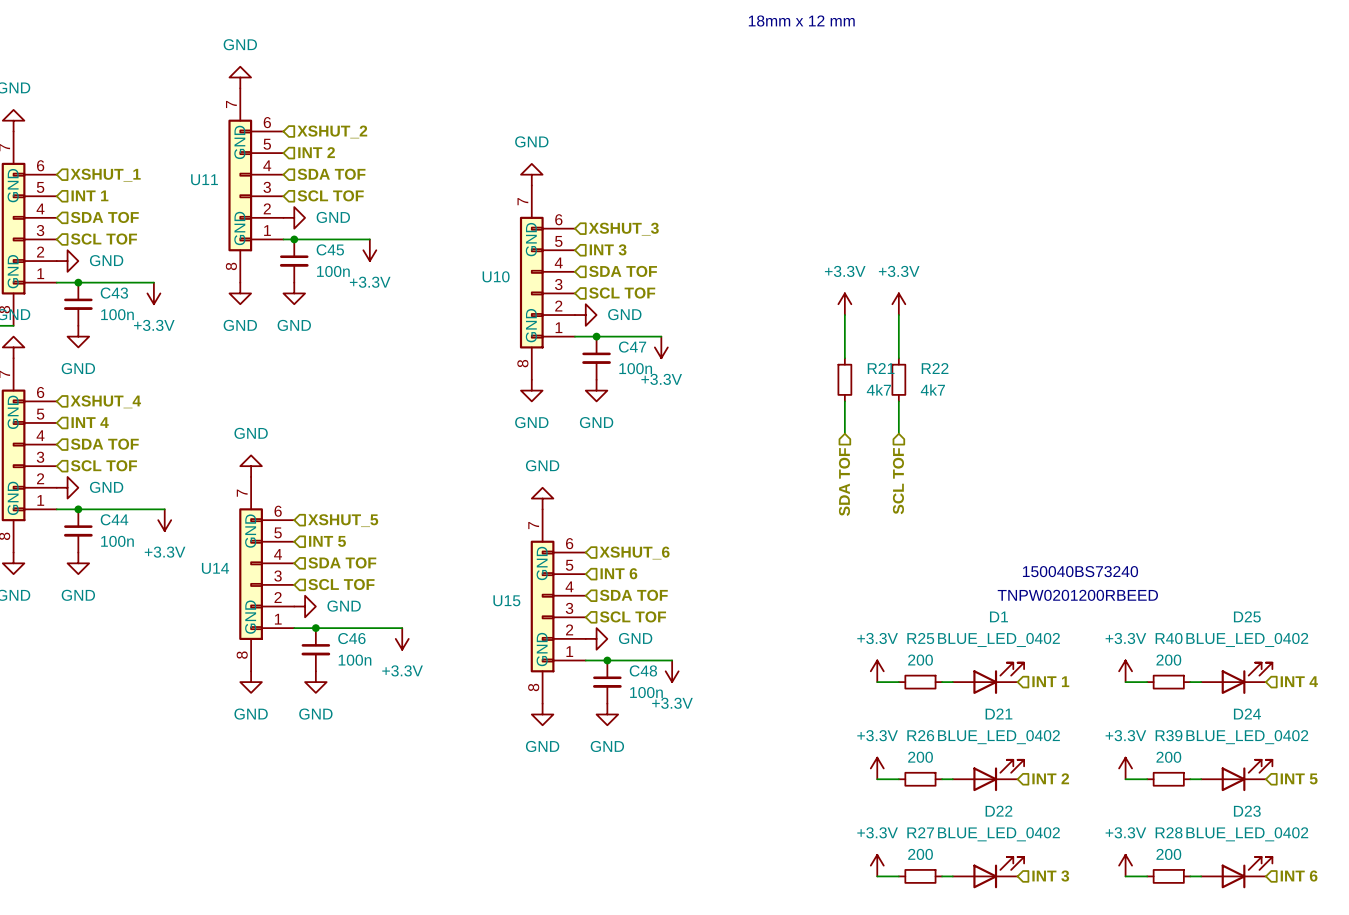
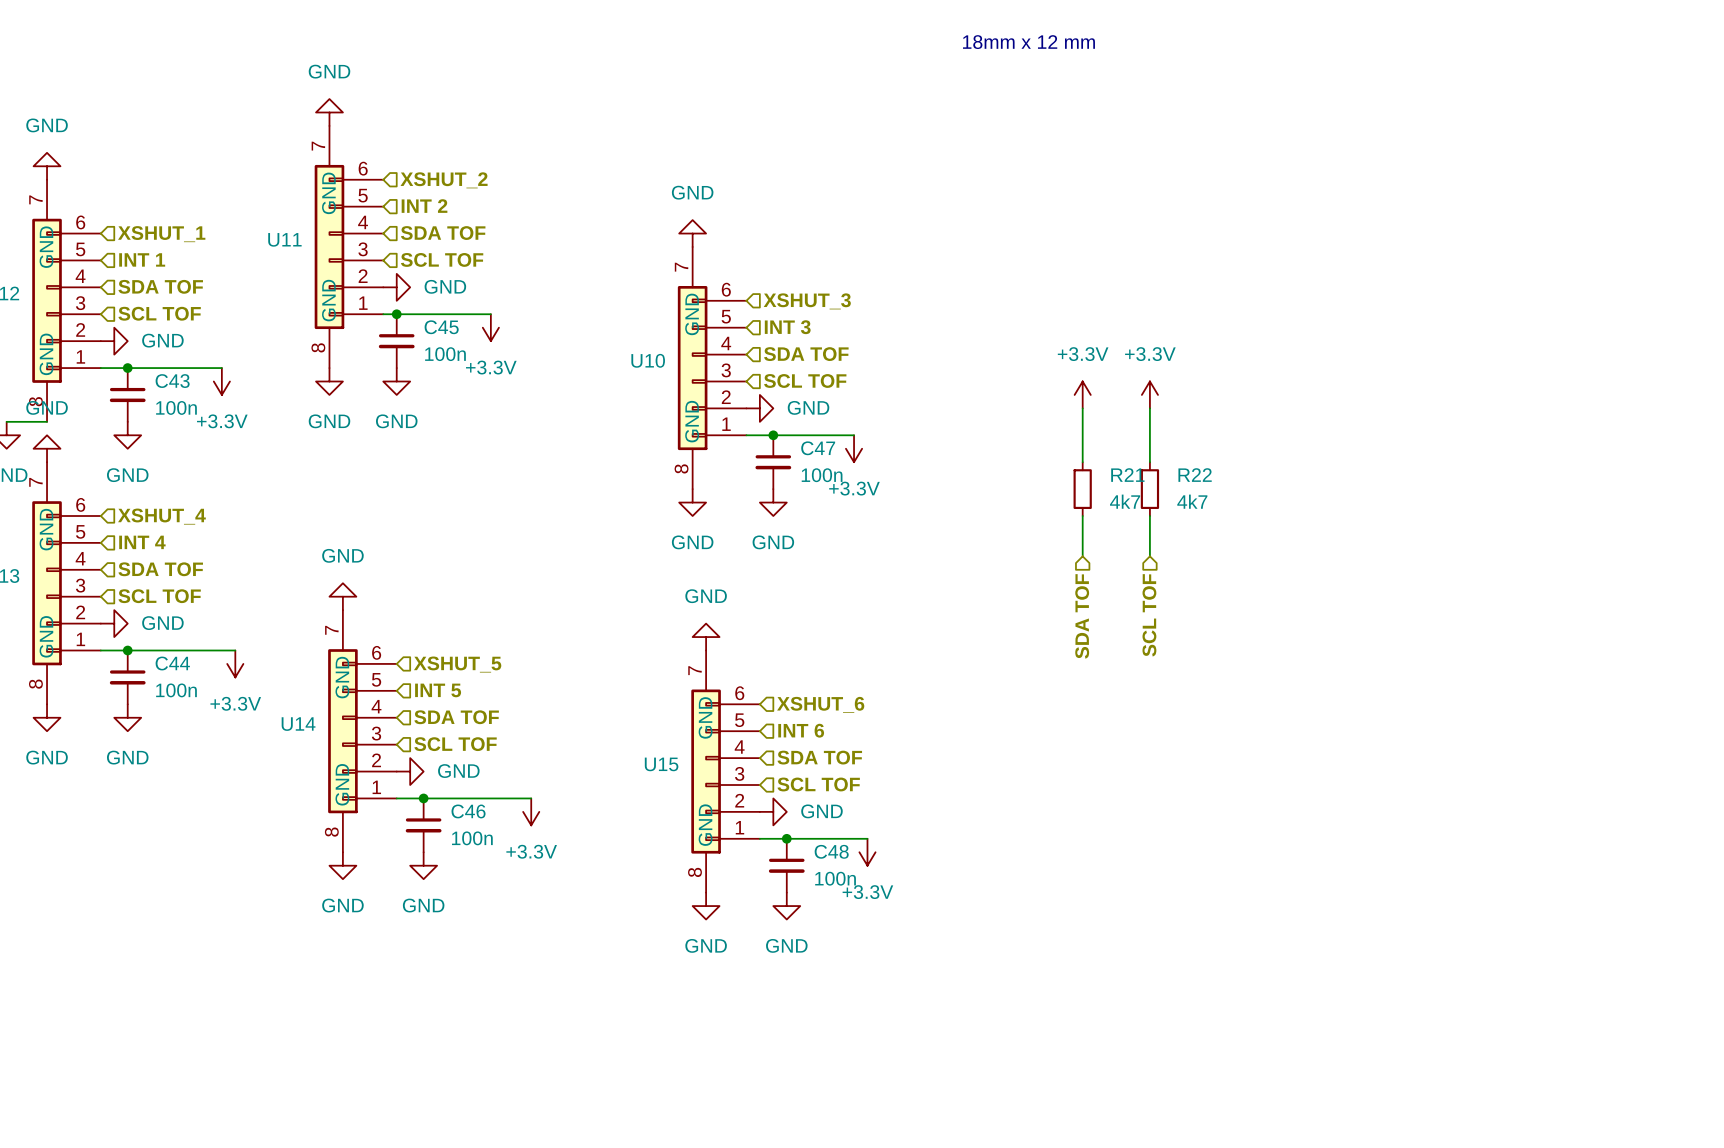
text: 150040BS73240 (1080, 571) -> none
text: TNPW0201200RBEED (1077, 595) -> none
power symbol: +3.3V (877, 671) -> none
power symbol: +3.3V (1125, 671) -> none
D1: BLUE_LED_0402 (988, 678) -> none
D25: BLUE_LED_0402 (1236, 678) -> none
hierarchical label: INT 1 (1050, 681) -> none
hierarchical label: INT 4 (1299, 681) -> none
wire: (877, 682) (898, 682) -> none
R25: 200 (920, 682) -> none
wire: (942, 682) (952, 682) -> none
wire: (1125, 682) (1147, 682) -> none
R40: 200 (1168, 682) -> none
wire: (1190, 682) (1201, 682) -> none
power symbol: +3.3V (877, 768) -> none
power symbol: +3.3V (1125, 768) -> none
D21: BLUE_LED_0402 (988, 775) -> none
D24: BLUE_LED_0402 (1236, 775) -> none
hierarchical label: INT 2 (1050, 778) -> none
hierarchical label: INT 5 (1299, 778) -> none
wire: (877, 779) (898, 779) -> none
R26: 200 (920, 779) -> none
wire: (942, 779) (952, 779) -> none
wire: (1125, 779) (1147, 779) -> none
R39: 200 (1168, 779) -> none
wire: (1190, 779) (1201, 779) -> none
power symbol: +3.3V (877, 865) -> none
power symbol: +3.3V (1125, 865) -> none
D22: BLUE_LED_0402 (988, 872) -> none
D23: BLUE_LED_0402 (1236, 872) -> none
wire: (877, 876) (898, 876) -> none
R27: 200 (920, 876) -> none
wire: (942, 876) (952, 876) -> none
hierarchical label: INT 3 (1050, 876) -> none
wire: (1125, 876) (1147, 876) -> none
R28: 200 (1168, 876) -> none
wire: (1190, 876) (1201, 876) -> none
hierarchical label: INT 6 (1299, 876) -> none

